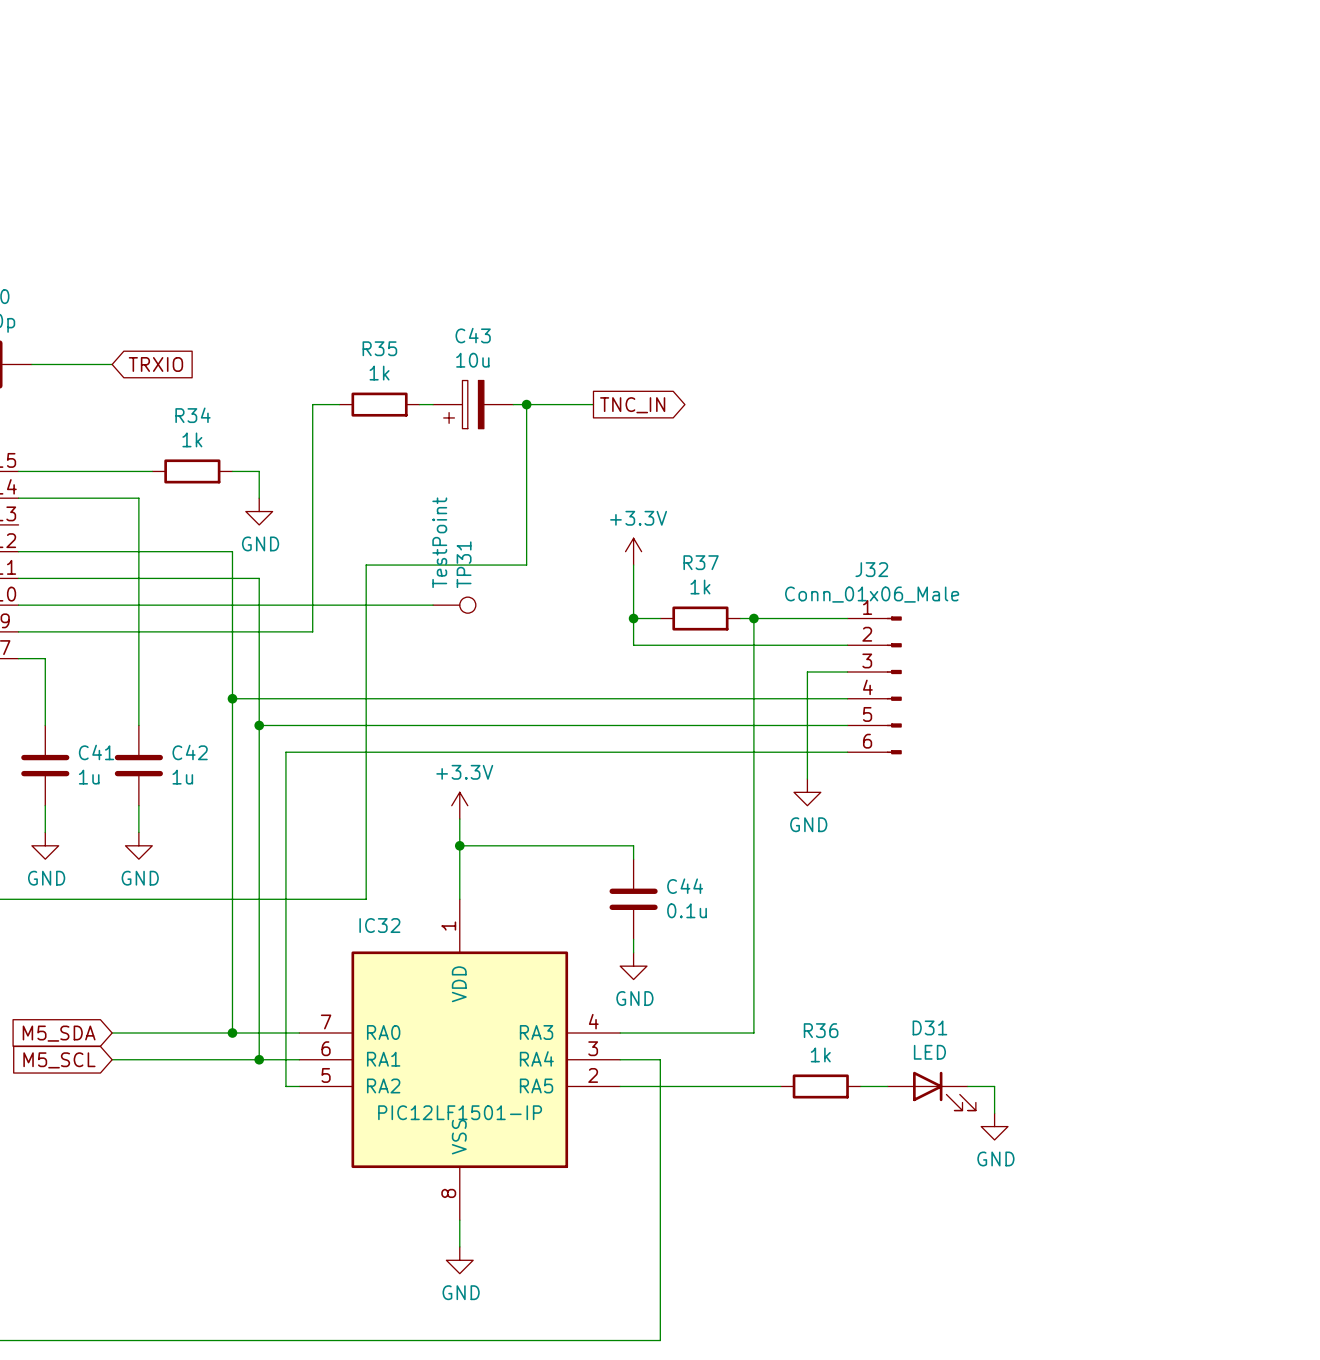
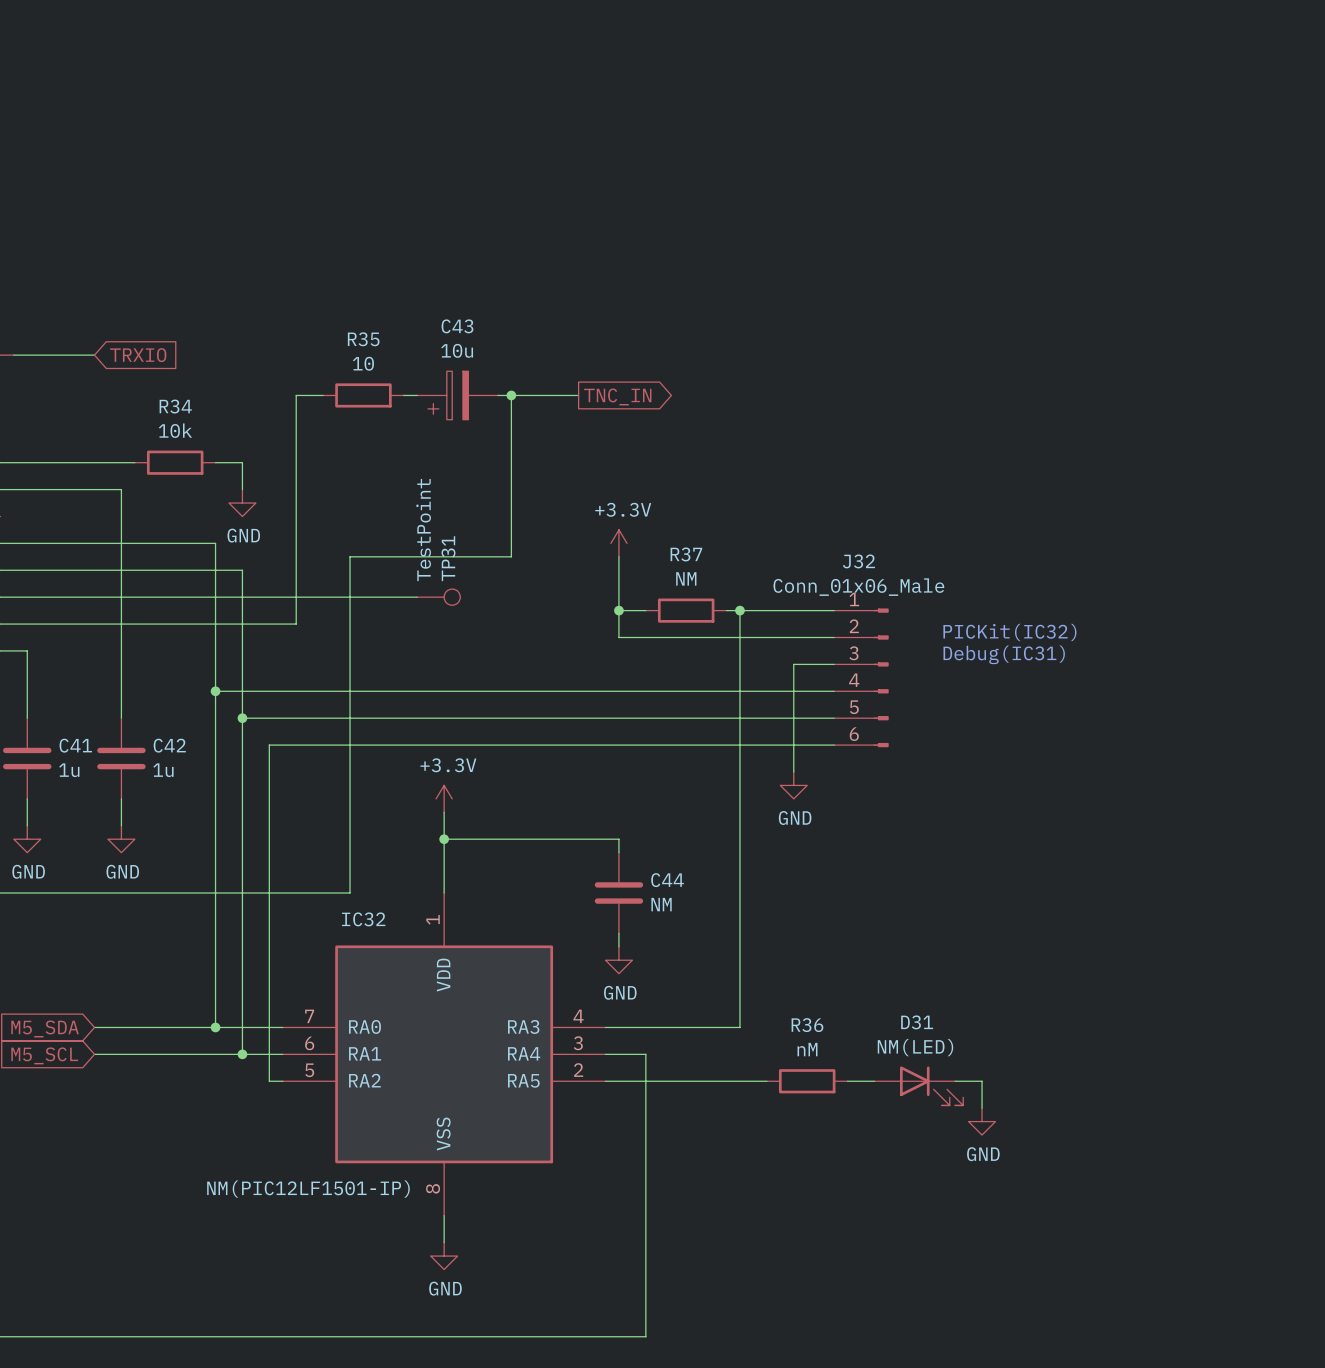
R35 value: 1k (379, 373) -> 10 (363, 363)
R34 value: 1k (192, 439) -> 10k (175, 430)
R37 value: 1k (700, 587) -> NM (686, 578)
text: none -> PICKit(IC32) (1009, 632)
text: none -> Debug(IC31) (1004, 654)
C44 value: 0.1u (687, 910) -> NM (661, 904)
D31 value: LED (929, 1052) -> NM(LED) (915, 1047)
R36 value: 1k (820, 1054) -> nM (807, 1049)
IC32 value: PIC12LF1501-IP (460, 1112) -> NM(PIC12LF1501-IP) (308, 1189)

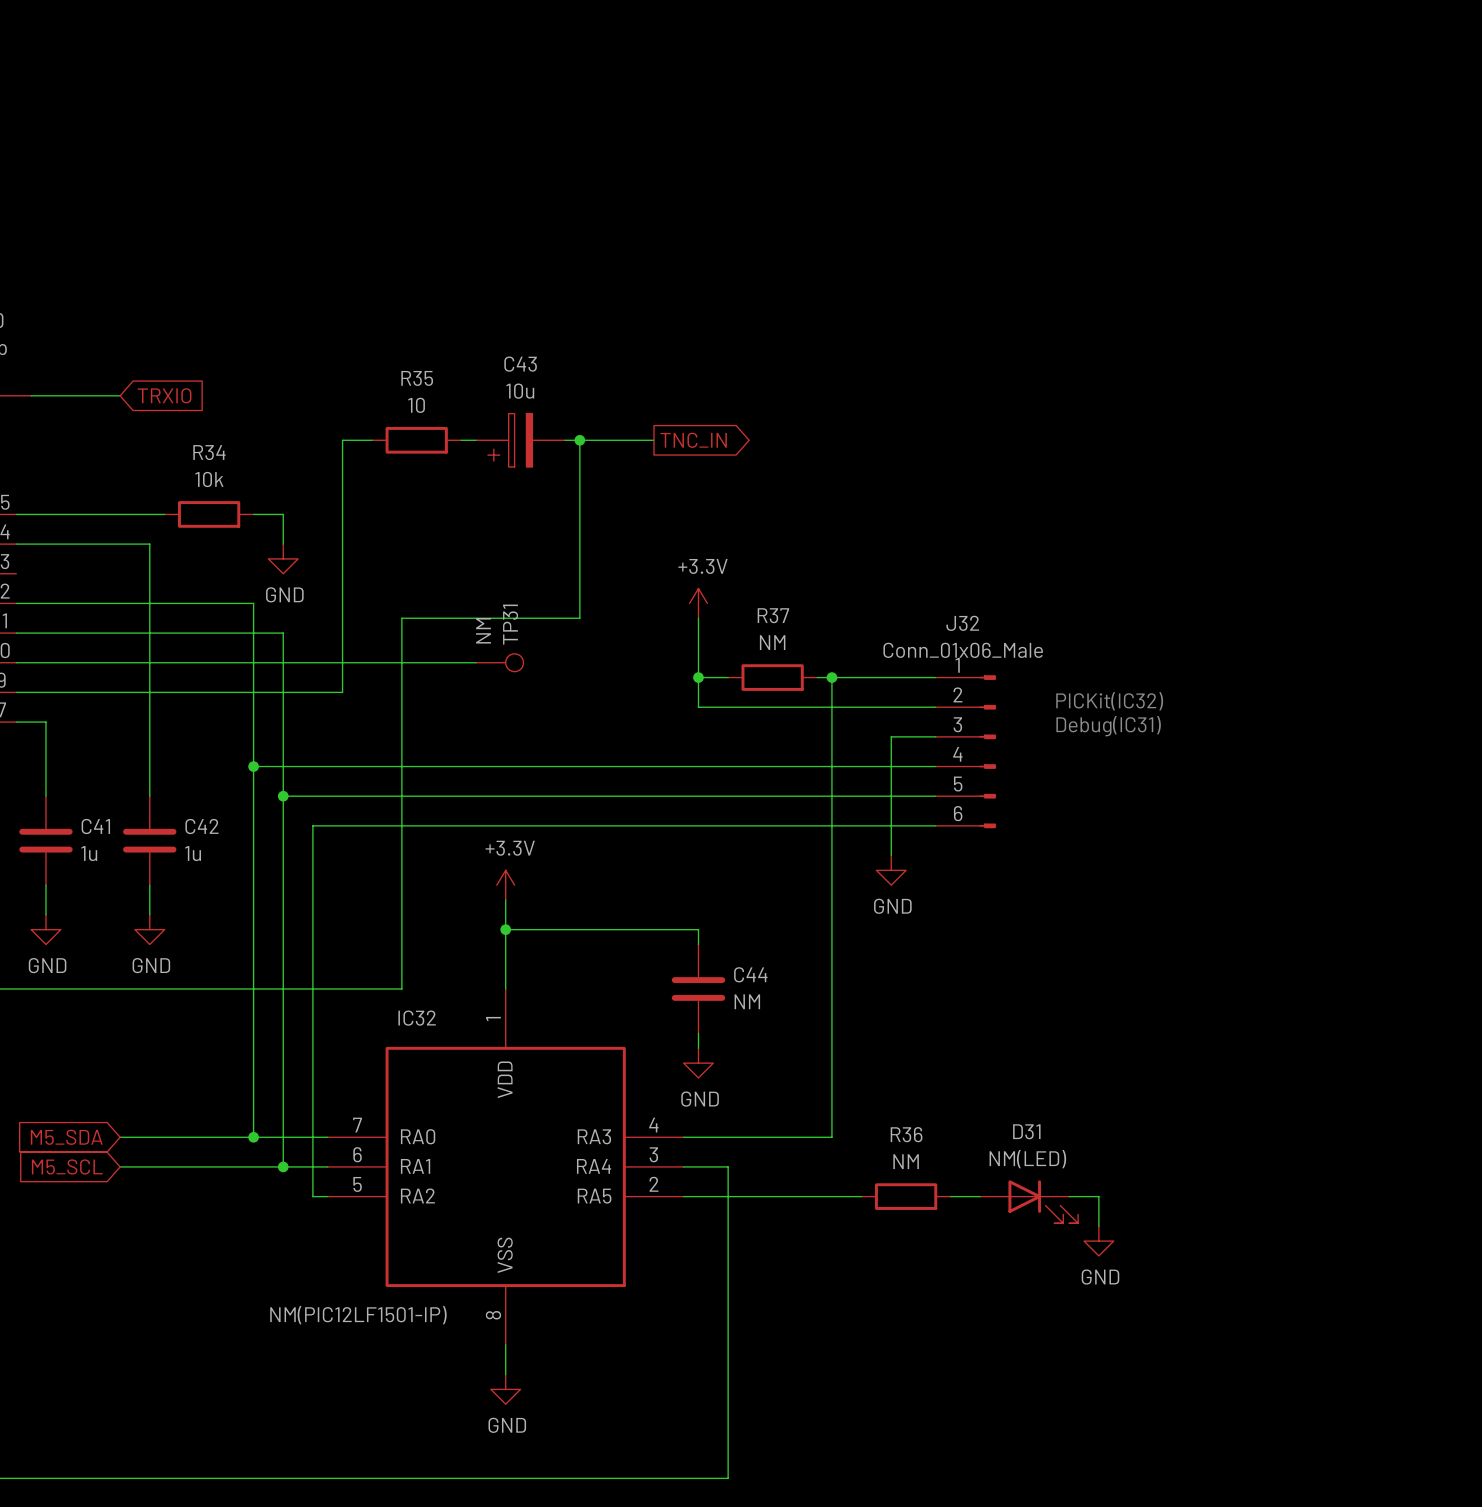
TP31 value: TestPoint (423, 530) -> NM (483, 630)
R36 value: nM (807, 1049) -> NM (906, 1161)

